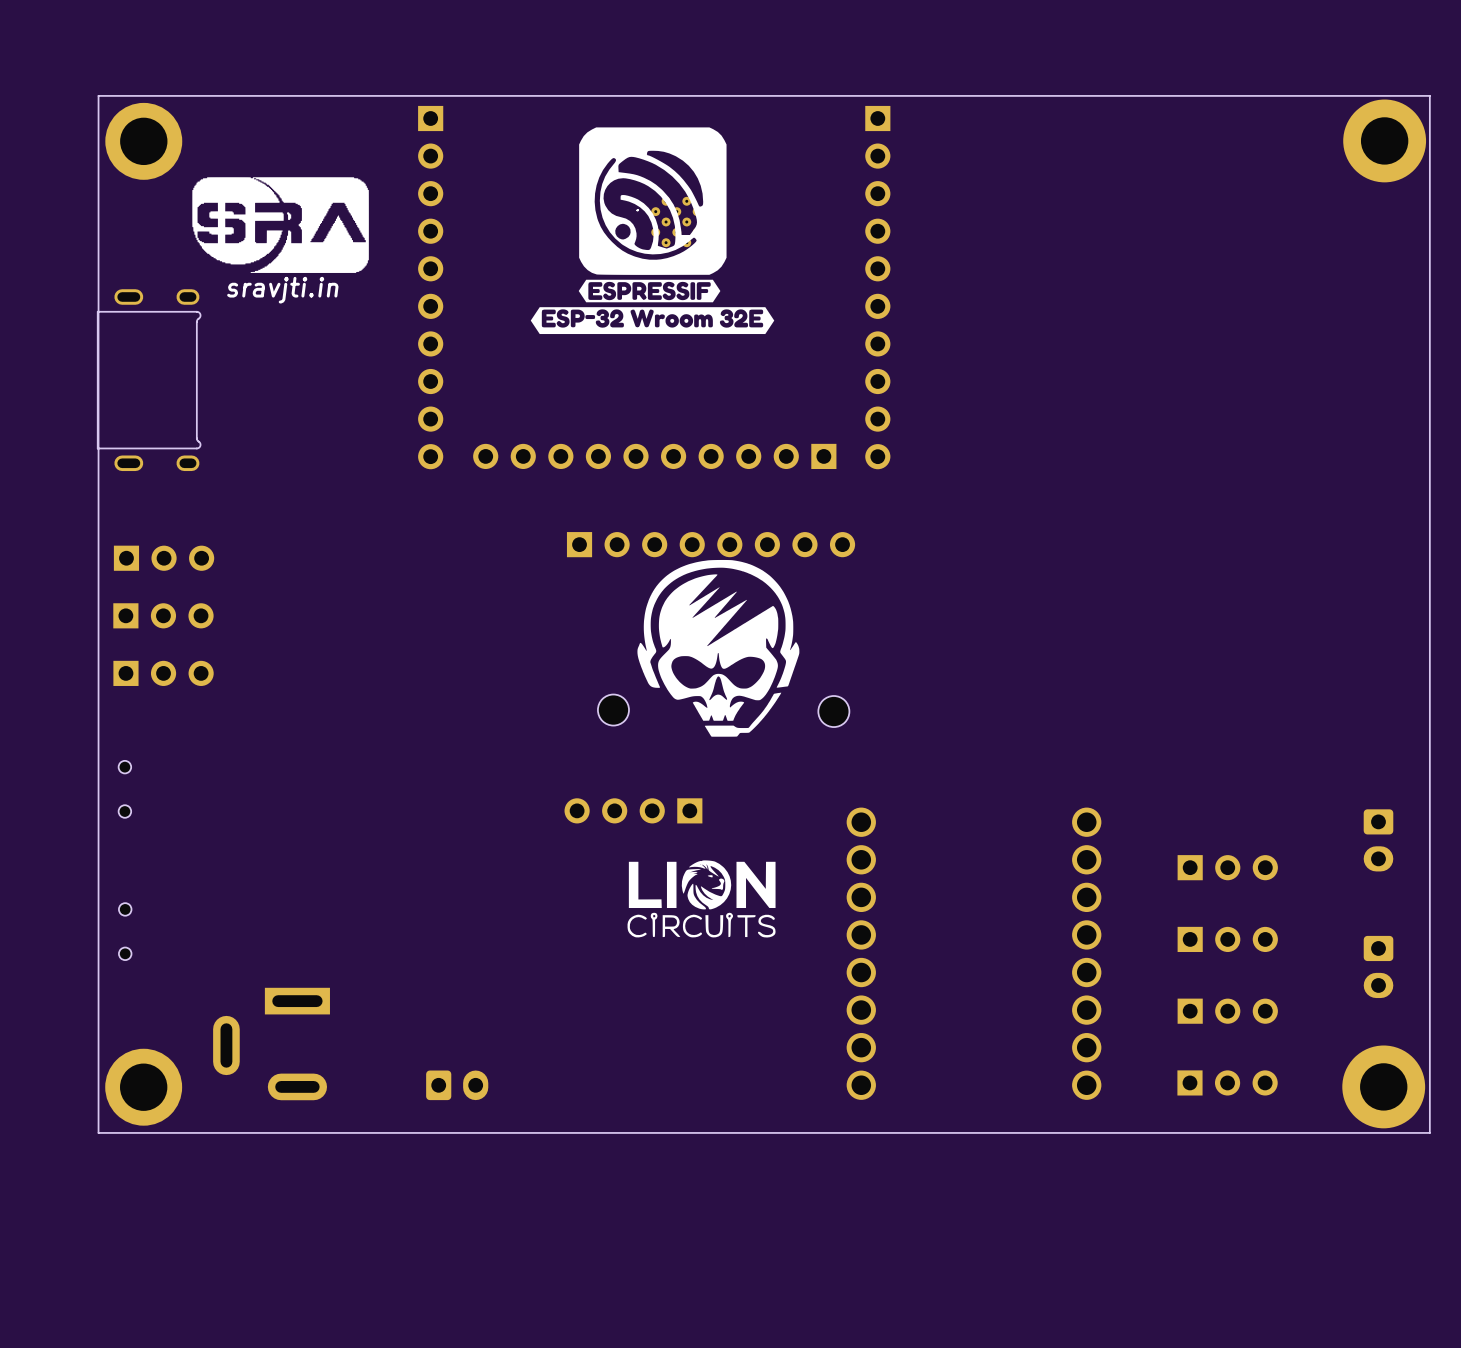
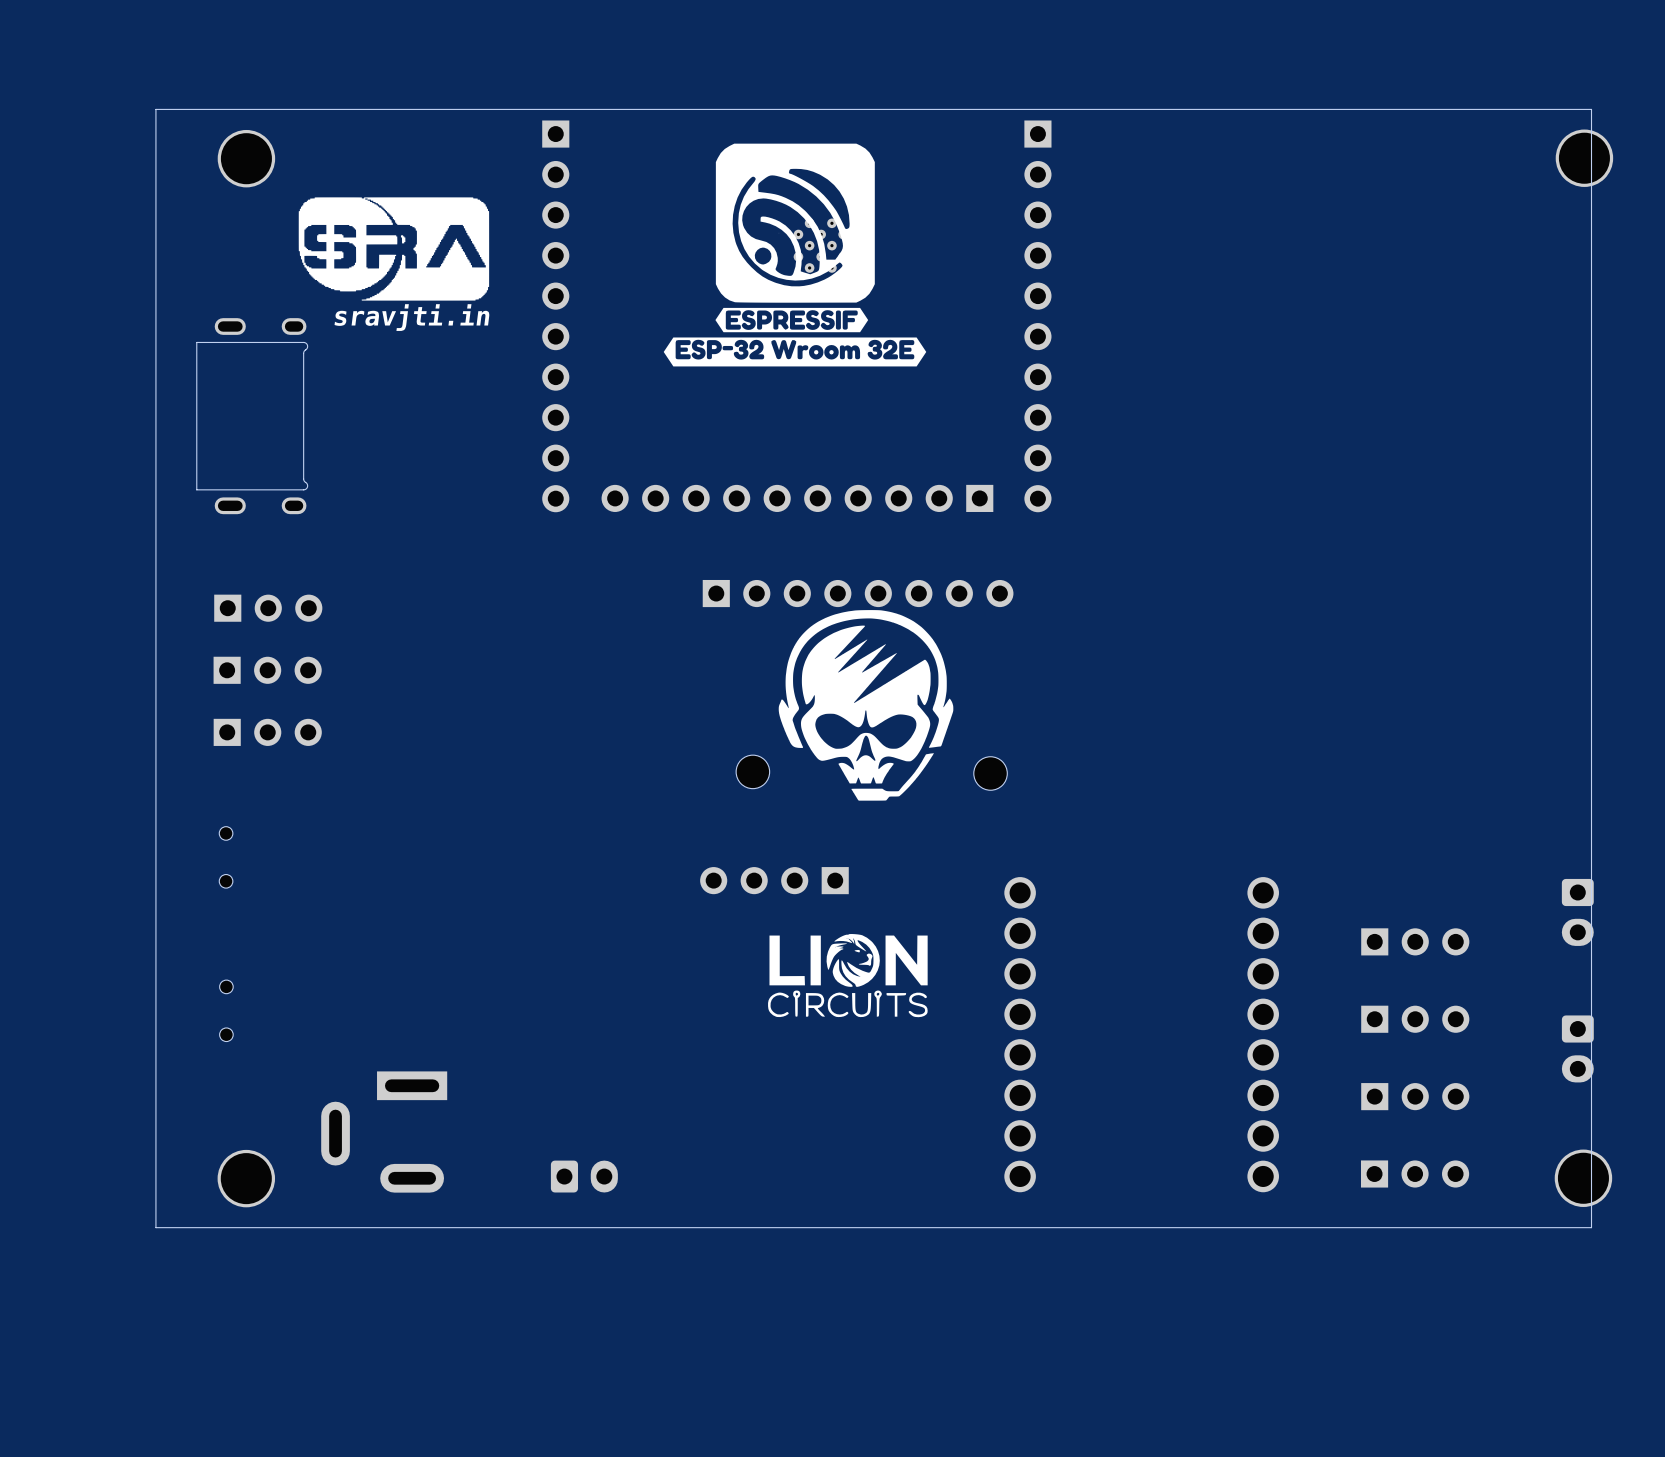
board edge: (1429, 95) (98, 95) (98, 1132) (1429, 1132) (1429, 95) -> (1591, 109) (1591, 1227) (155, 1227) (155, 109) (1591, 109)
part footprint: [1343, 99, 1427, 183] -> [1555, 129, 1614, 187]
part footprint: [105, 102, 183, 180] -> [217, 129, 276, 188]
part footprint: [1342, 1045, 1426, 1129] -> [1554, 1149, 1613, 1207]
part footprint: [105, 1048, 183, 1126] -> [217, 1149, 276, 1208]

